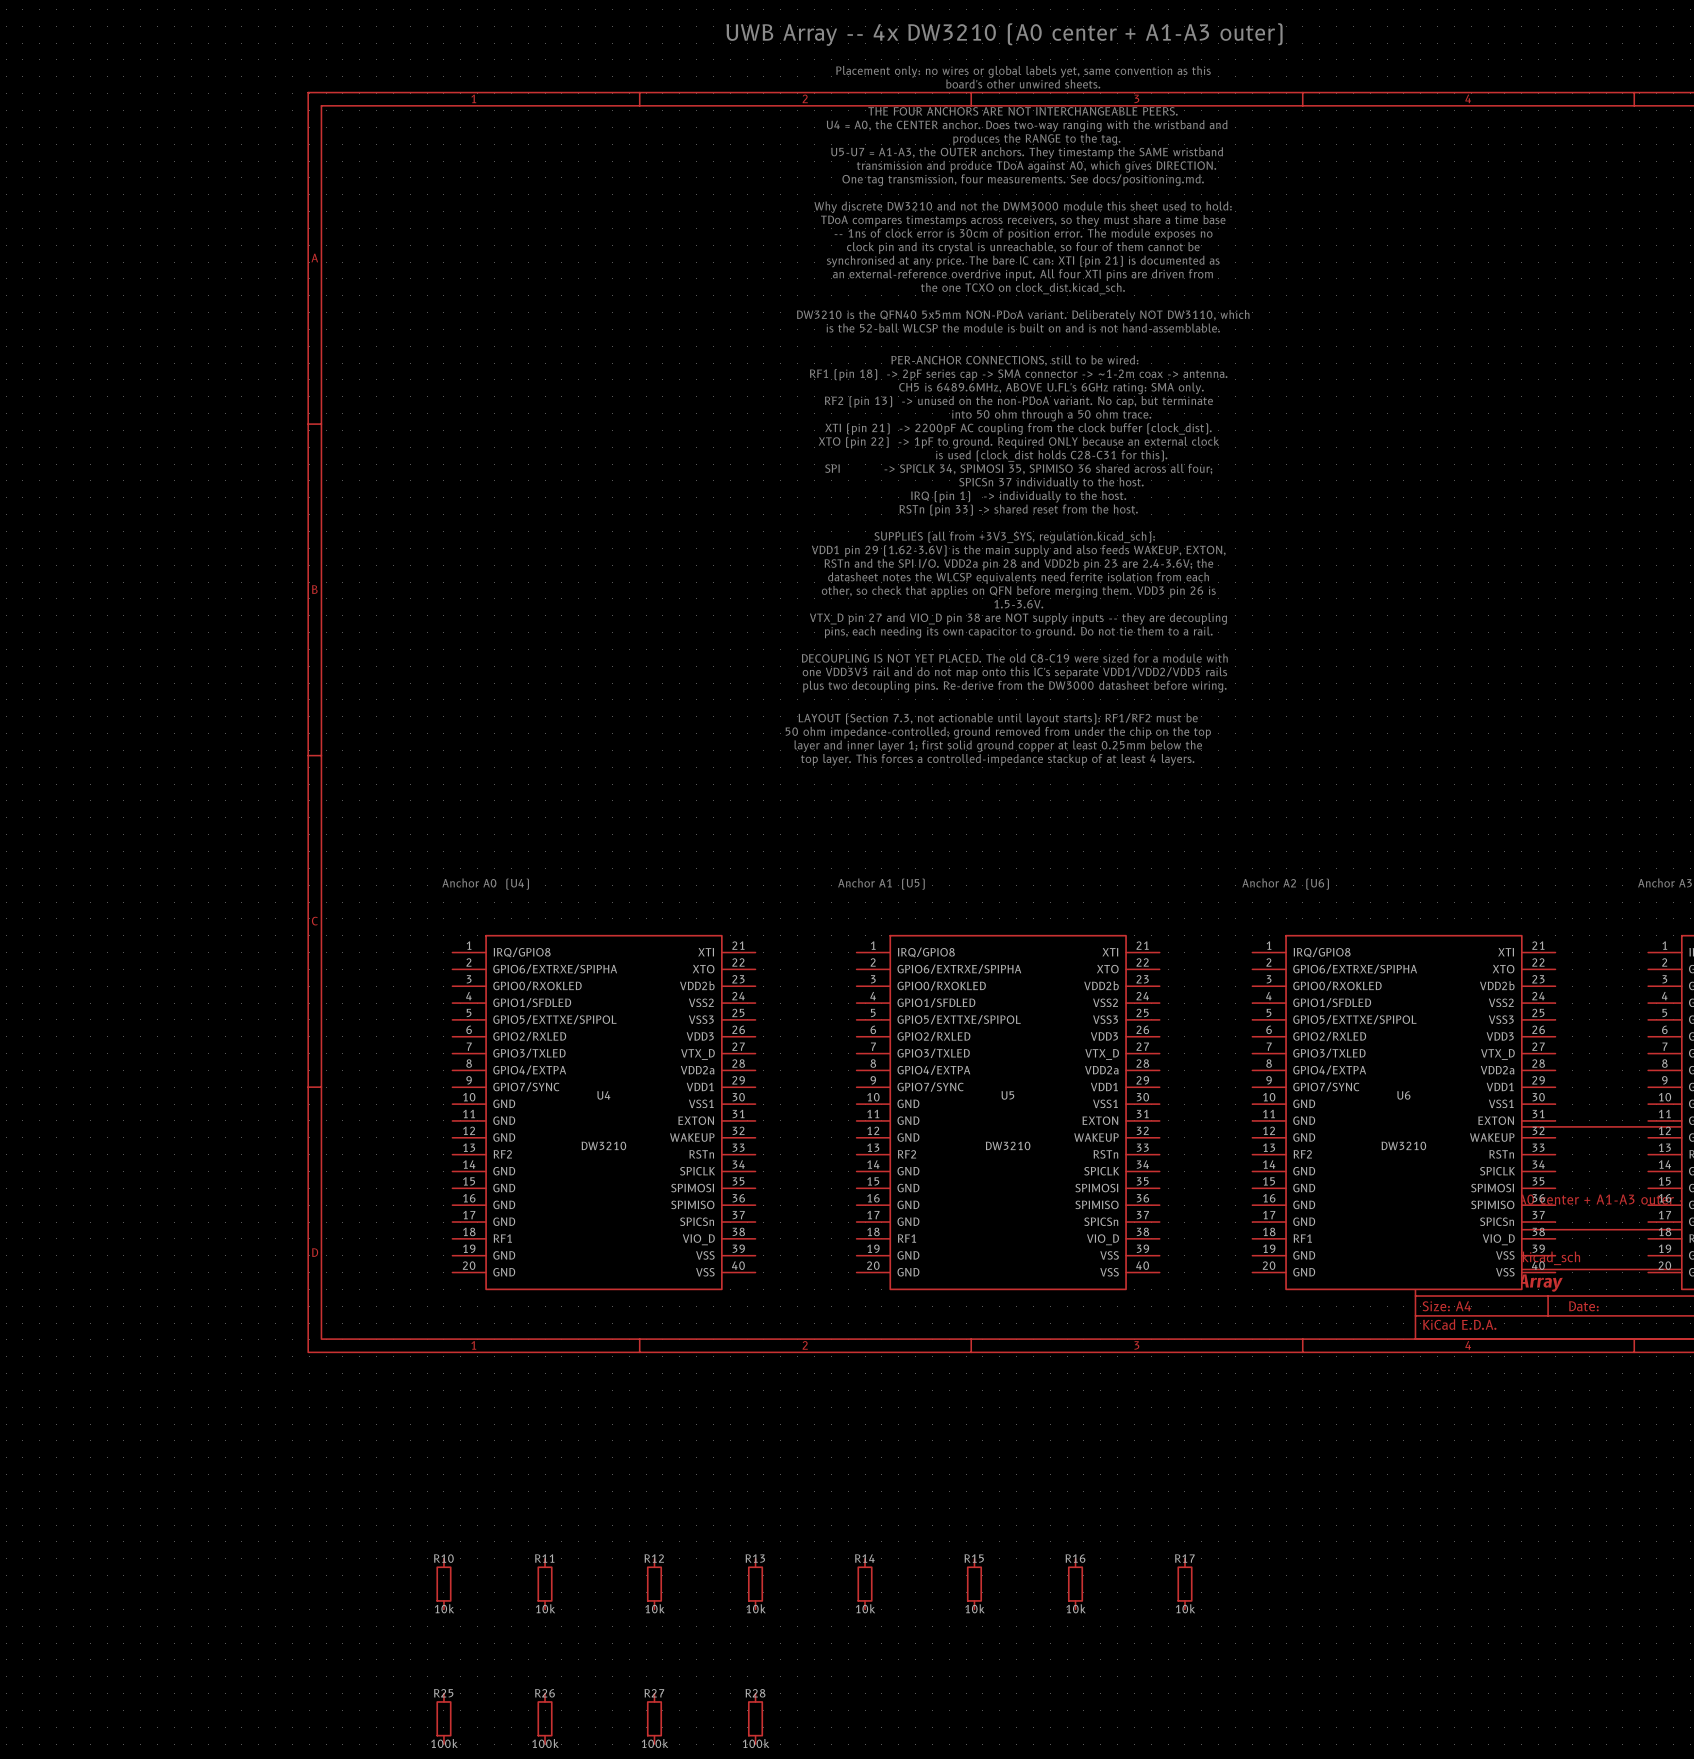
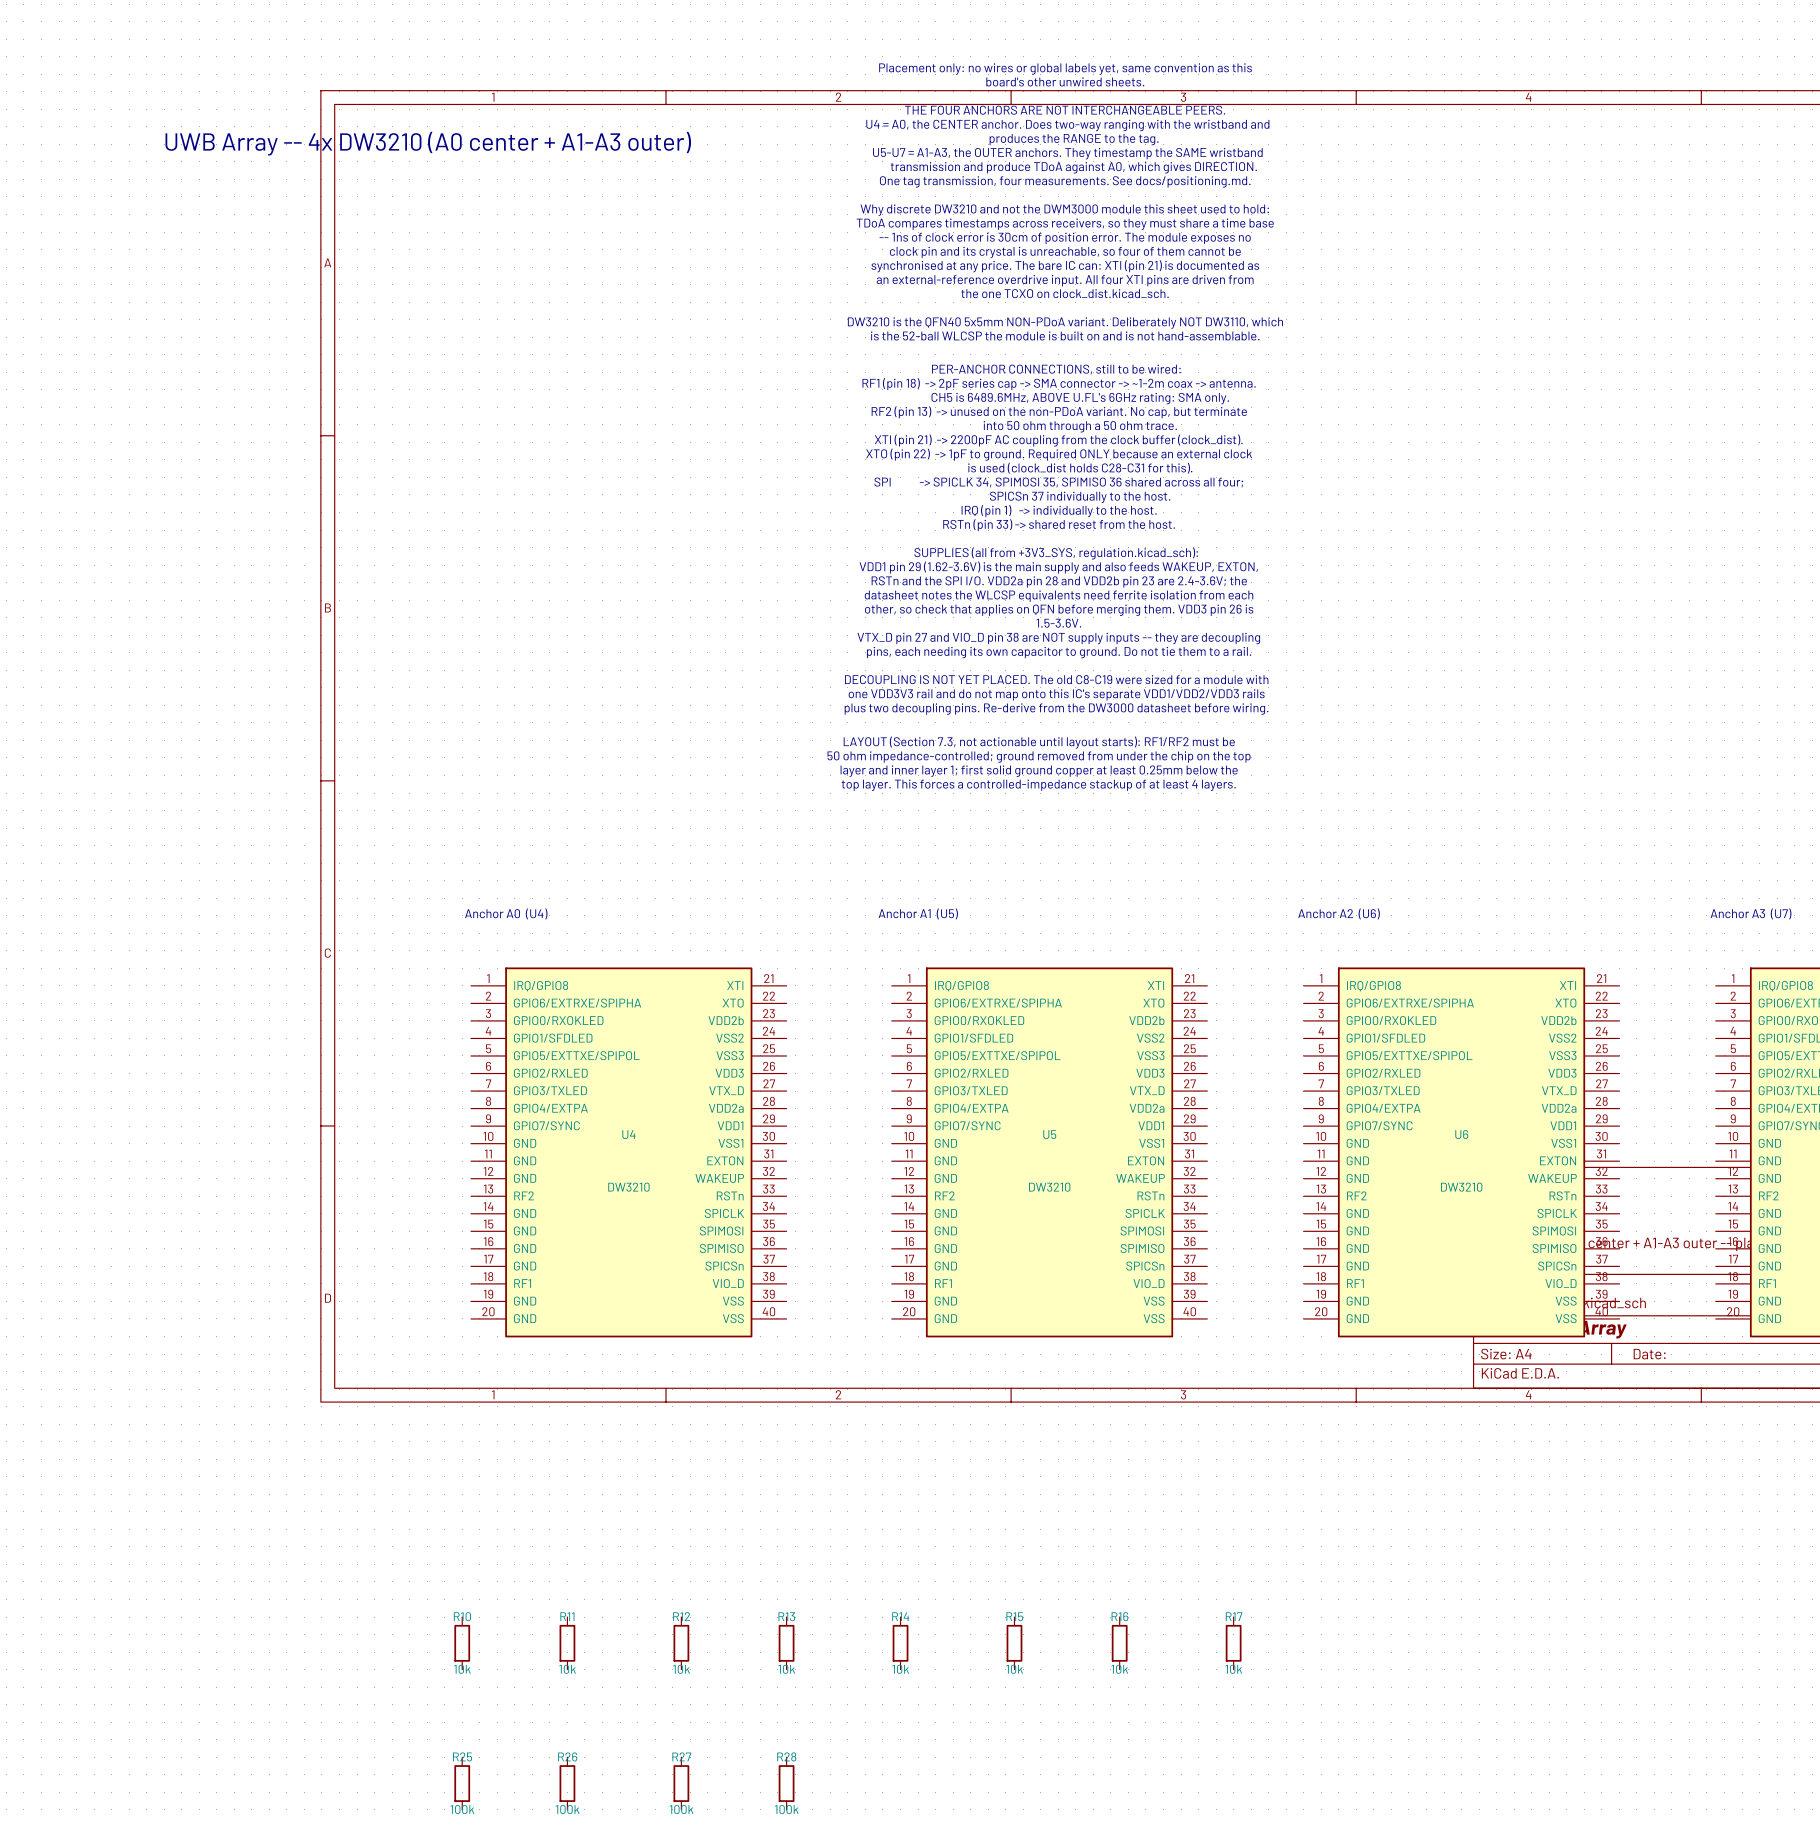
text: UWB Array -- 4x DW3210 (A0 center + A1-A3 outer) (1004, 34) -> none
text: none -> UWB Array -- 4x DW3210 (A0 center + A1-A3 outer) (428, 143)

